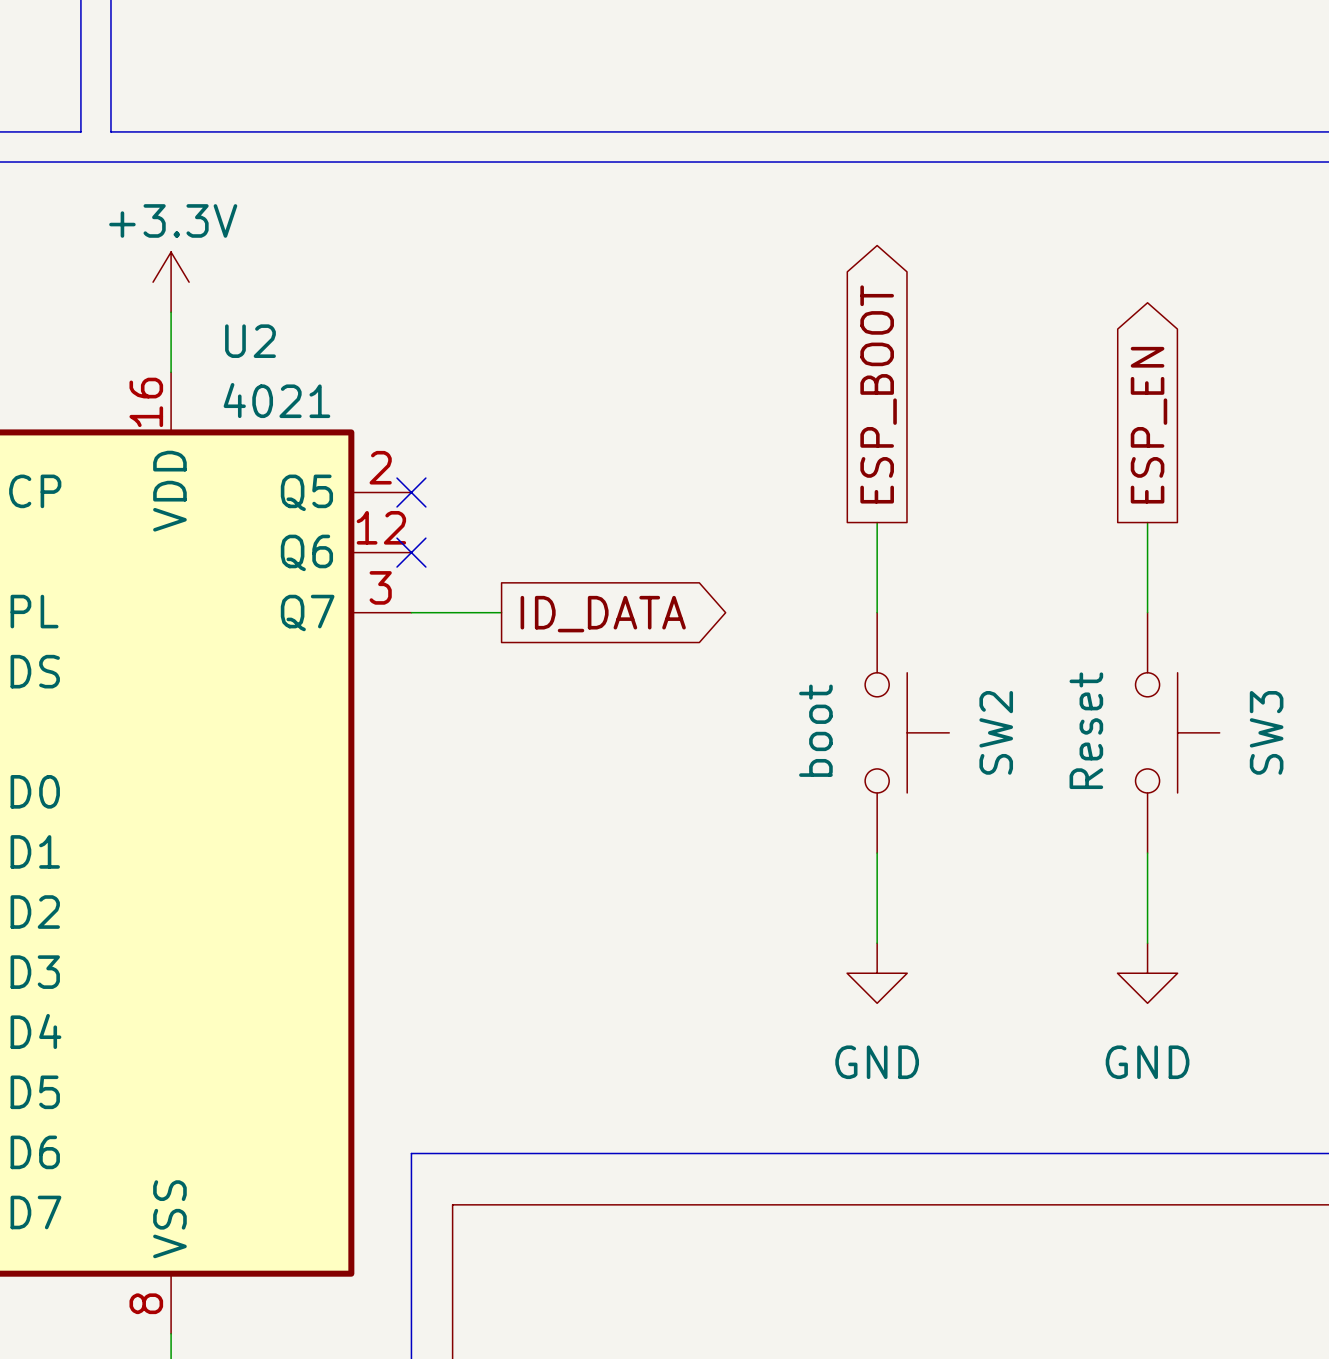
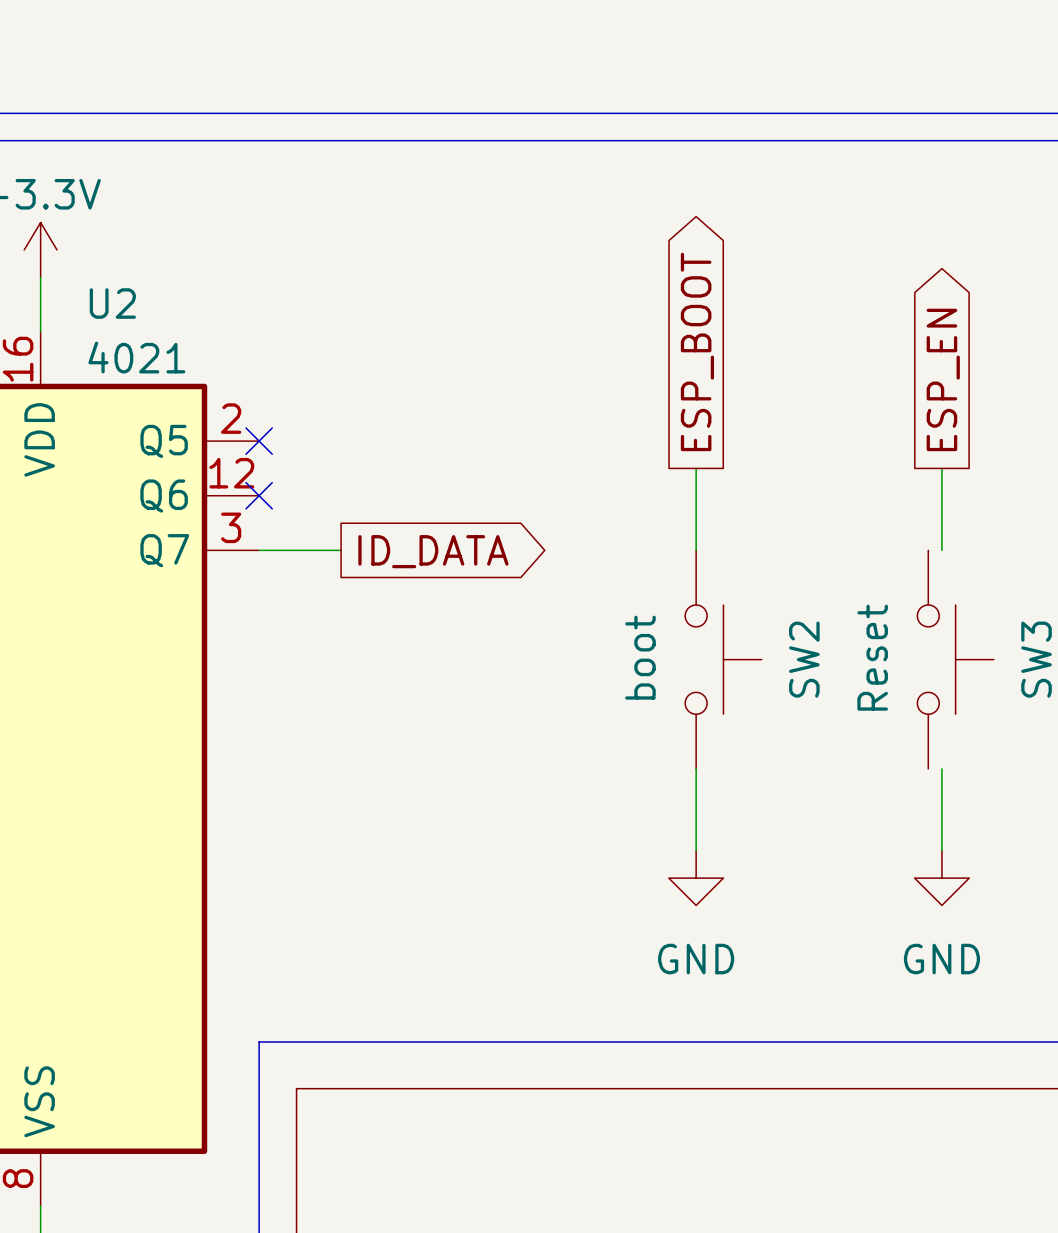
global label position: ESP_BOOT (878, 394) -> ESP_BOOT (697, 351)
global label position: ESP_EN (1148, 425) -> ESP_EN (943, 379)
wire: (877, 522) (877, 612) -> (696, 468) (696, 550)
wire: (1147, 522) (1147, 612) -> (941, 468) (941, 550)
SW2 position: (907, 732) -> (723, 659)
wire: (877, 853) (877, 943) -> (696, 768) (696, 850)
wire: (1147, 853) (1147, 943) -> (941, 768) (941, 850)
power symbol position: GND (877, 973) -> GND (696, 878)
power symbol position: GND (1147, 973) -> GND (941, 878)

